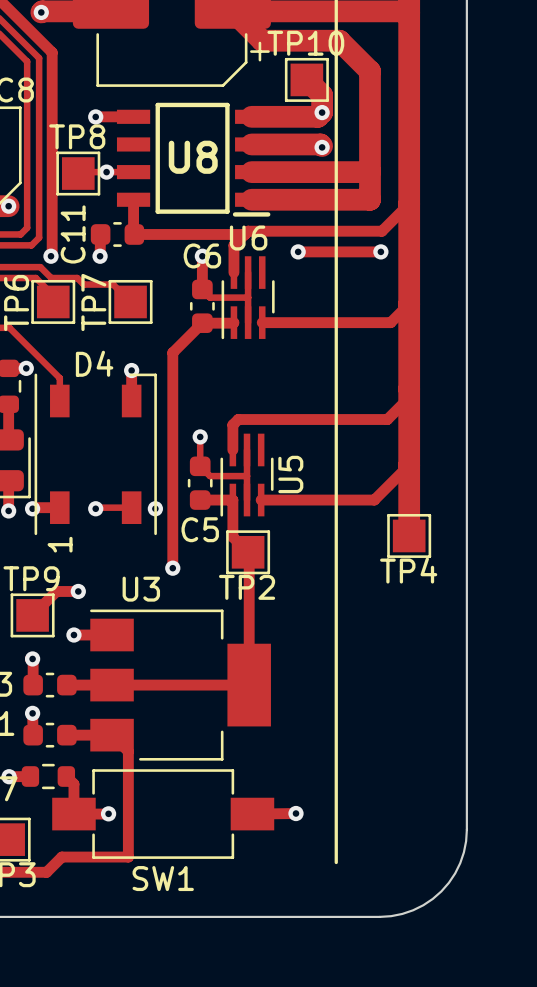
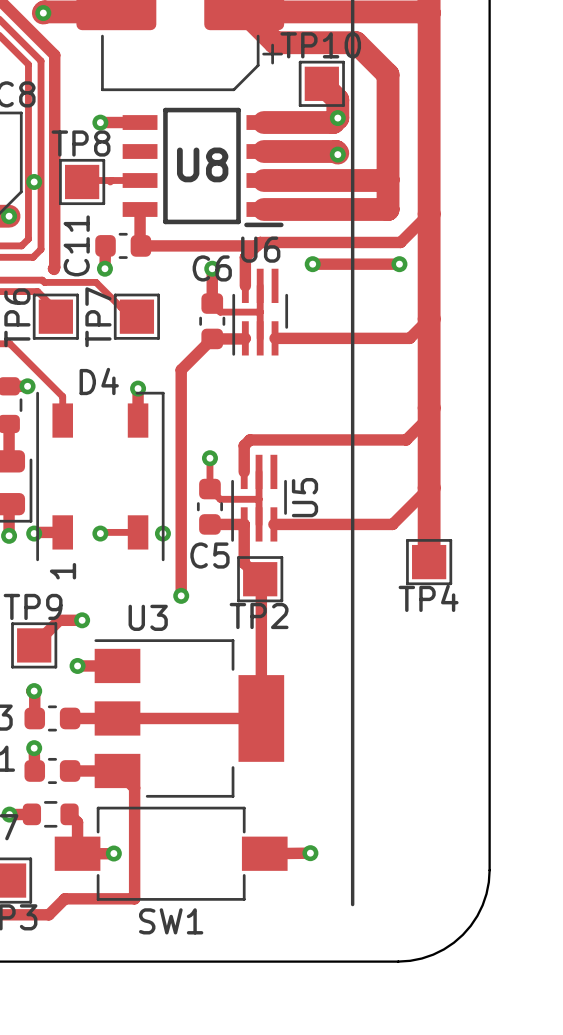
via: (106, 172) -> none
via: none -> (34, 181)
via: (50, 256) -> none
track: (42, 269) (51, 278) (77, 278) (83, 284) (113, 284) (130, 301) -> (44, 282) (96, 282) (121, 307) (134, 307)

